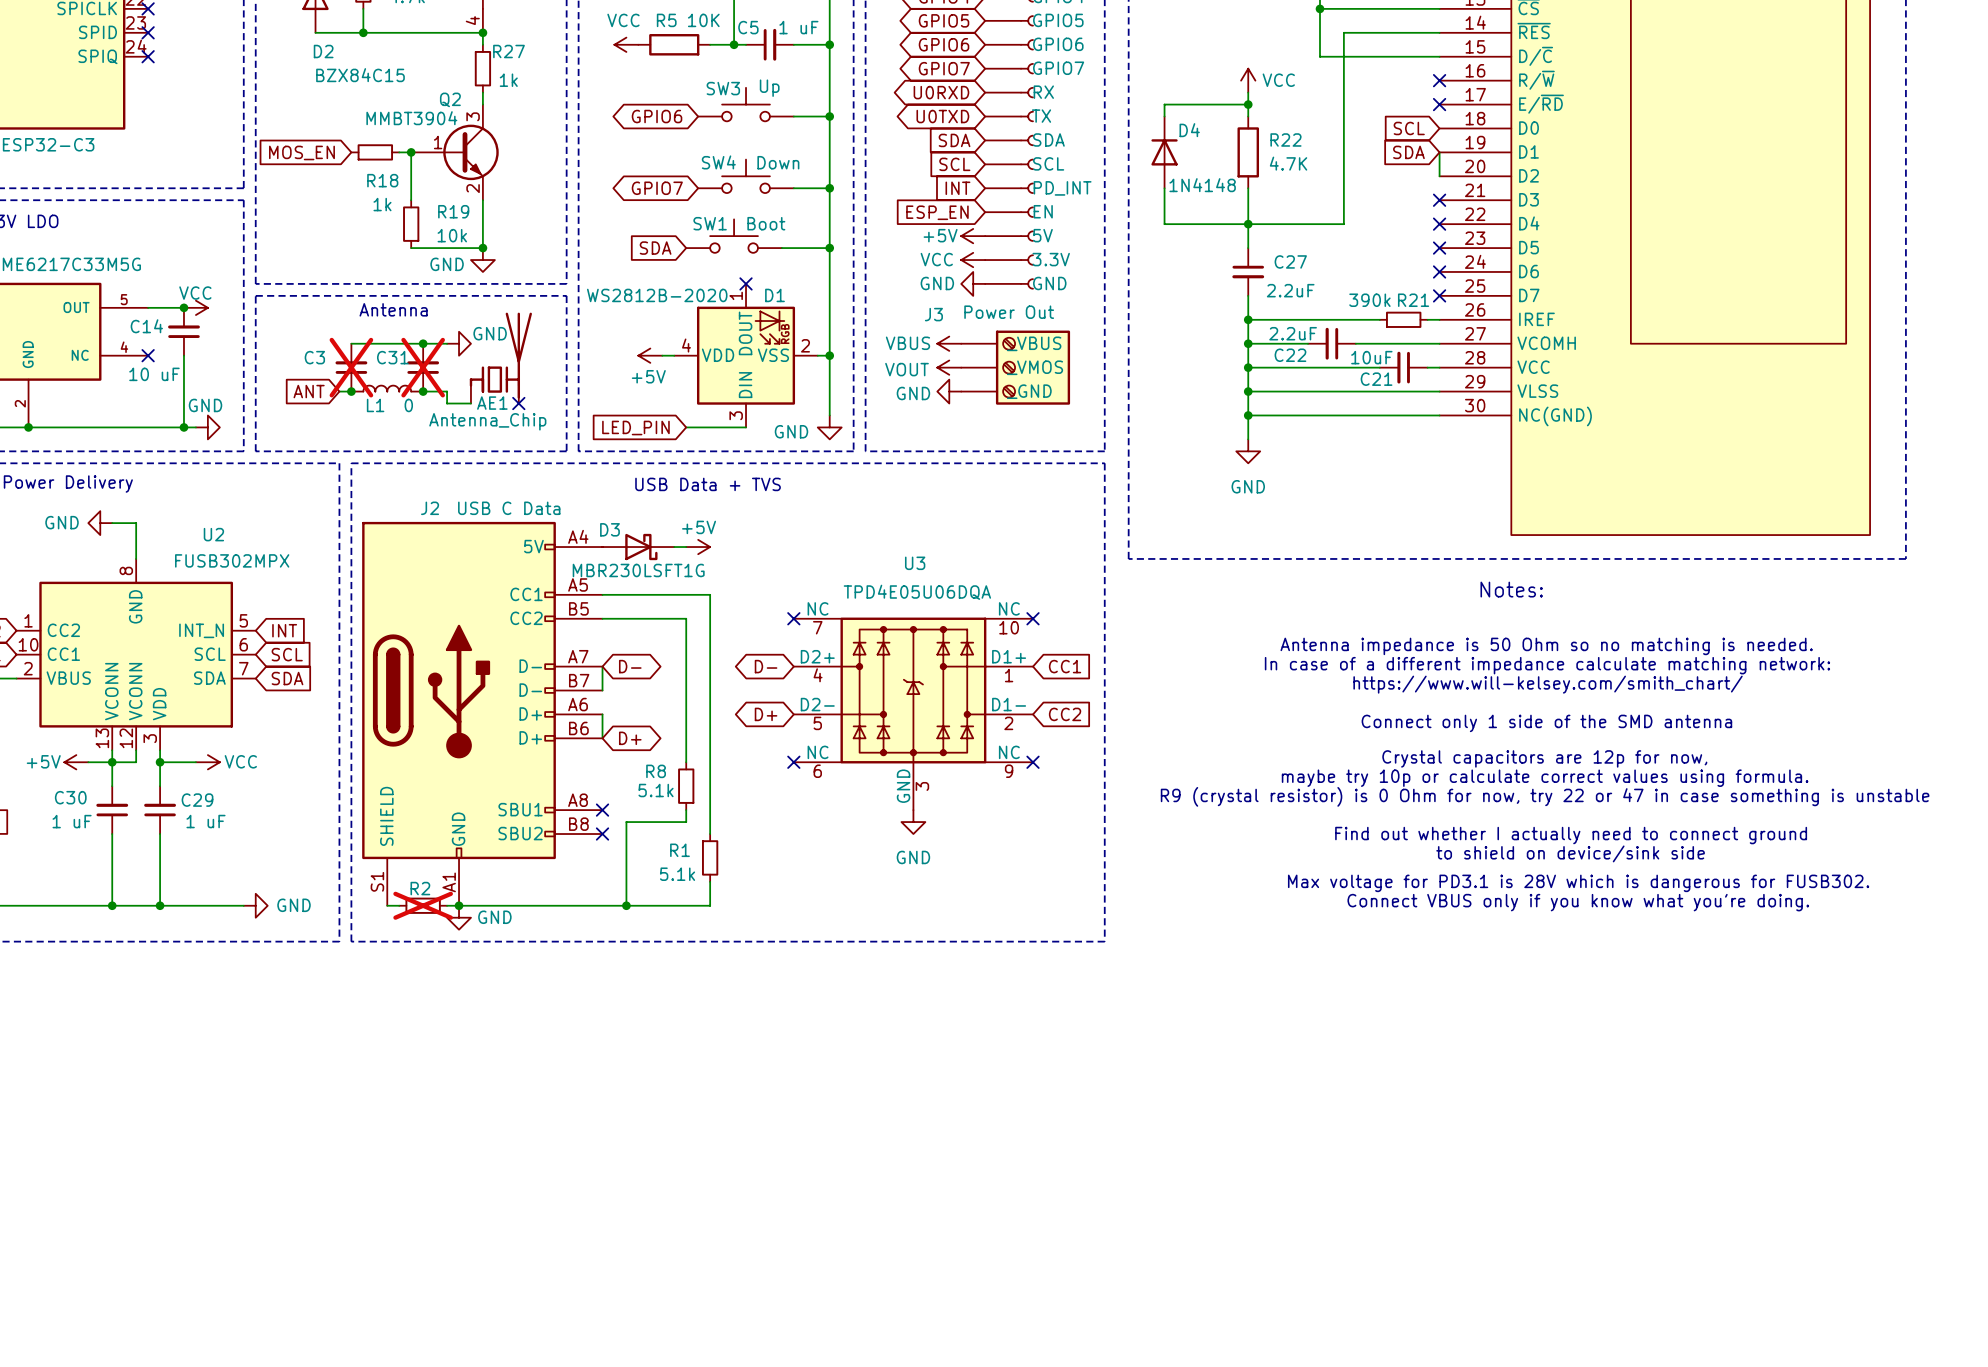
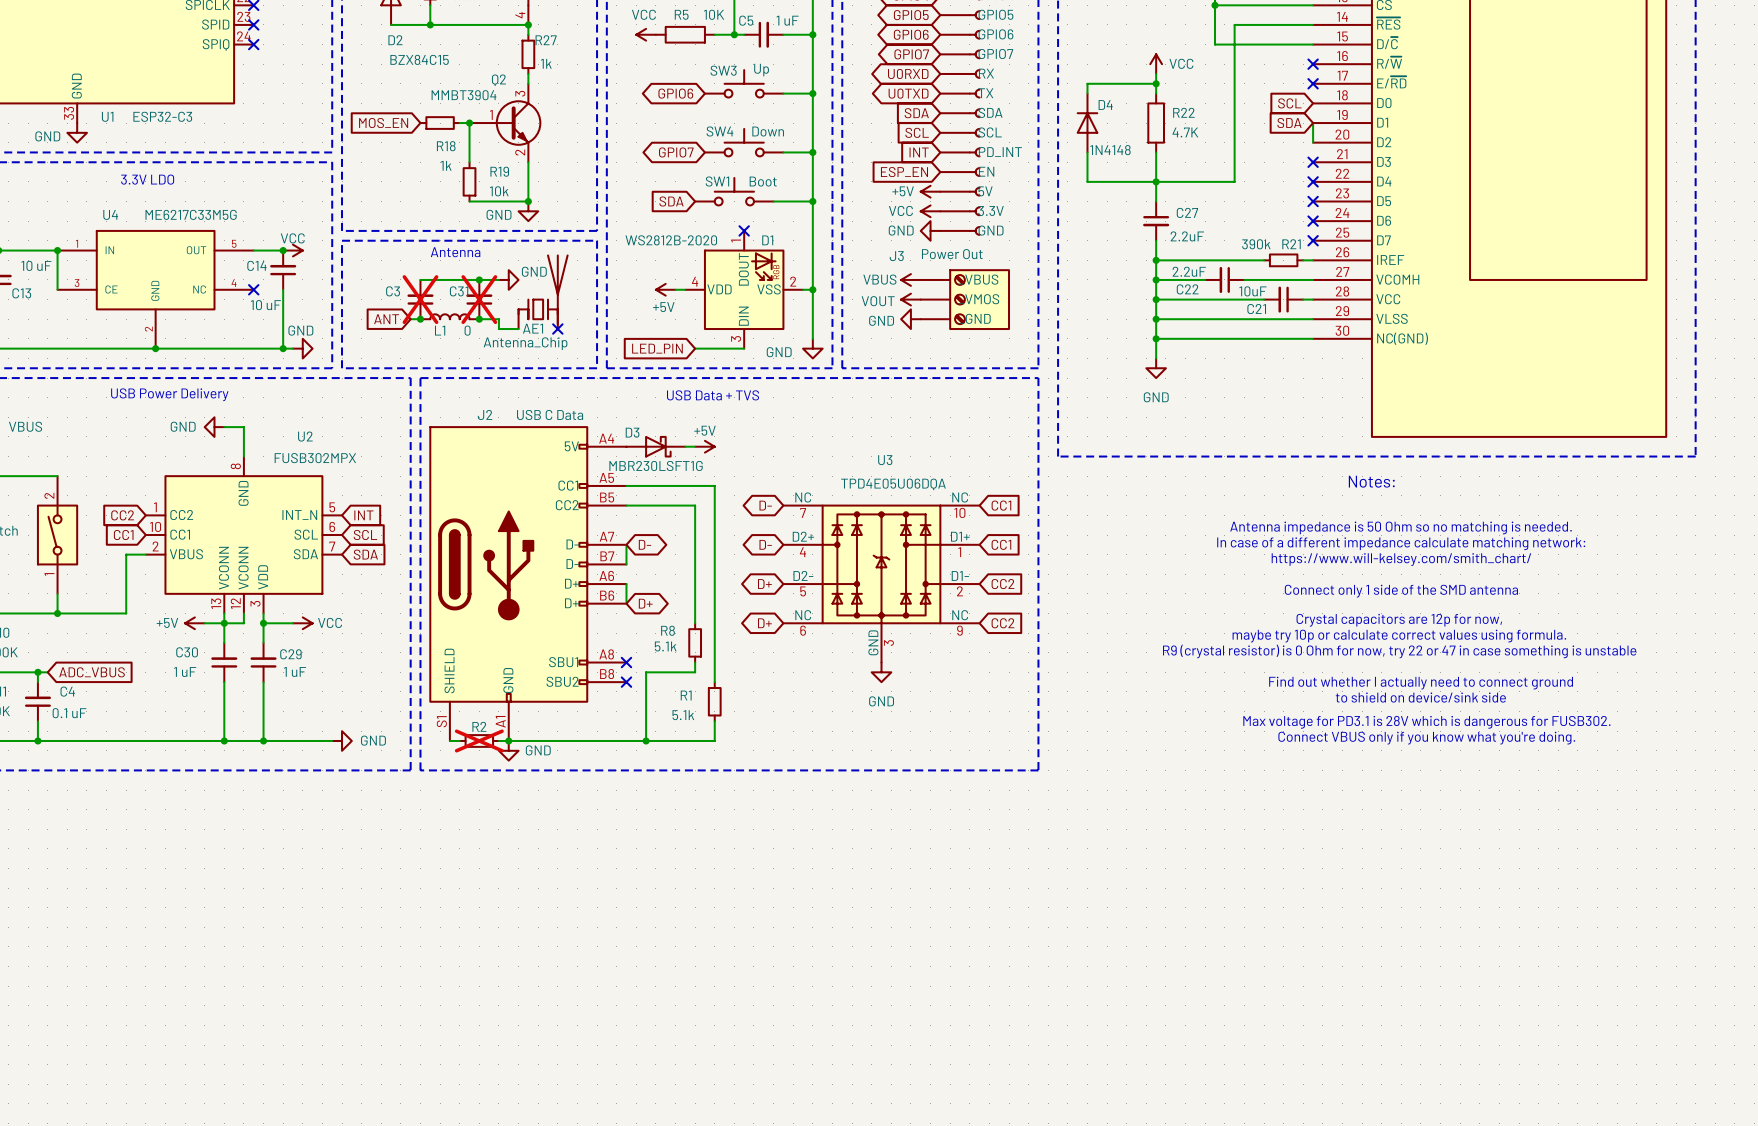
global label: none -> D- (765, 505)
no-connect mark: (793, 618) -> none
no-connect mark: (1033, 618) -> none
global label: none -> CC1 (1001, 505)
global label: none -> D+ (764, 623)
no-connect mark: (793, 762) -> none
no-connect mark: (1033, 762) -> none
global label: none -> CC2 (1002, 623)

